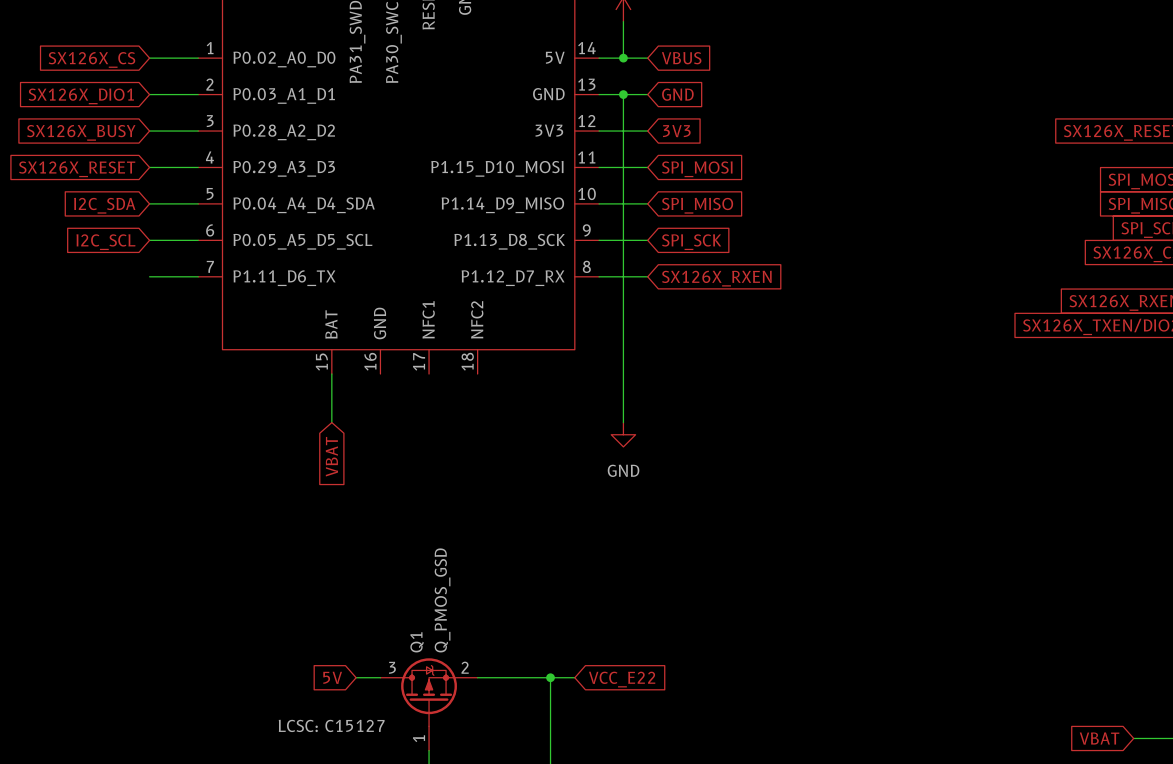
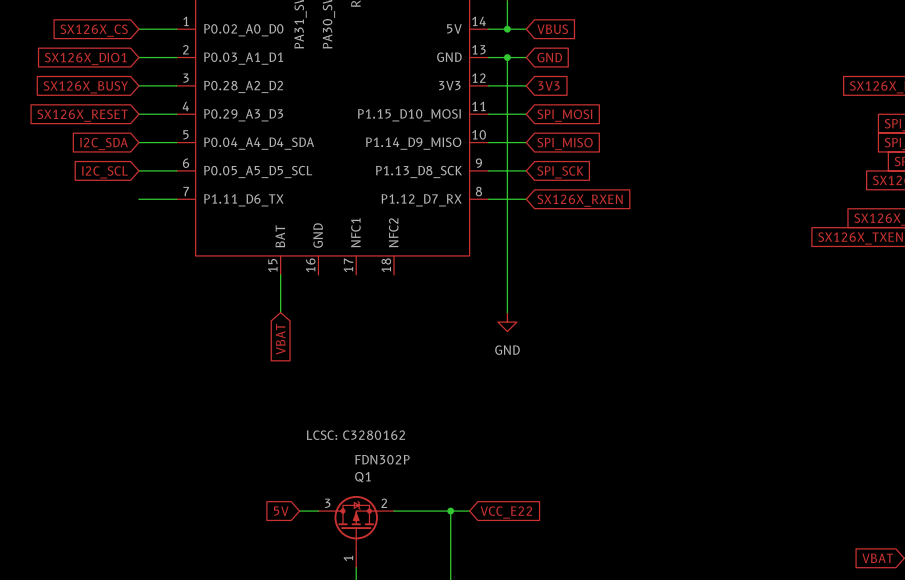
Q1 value: Q_PMOS_GSD (442, 600) -> FDN302P (382, 459)
Q1 name rotation: 0° (417, 642) -> 90° clockwise (362, 477)
Q1 text: LCSC: C15127 (331, 725) -> LCSC: C3280162 (355, 435)

